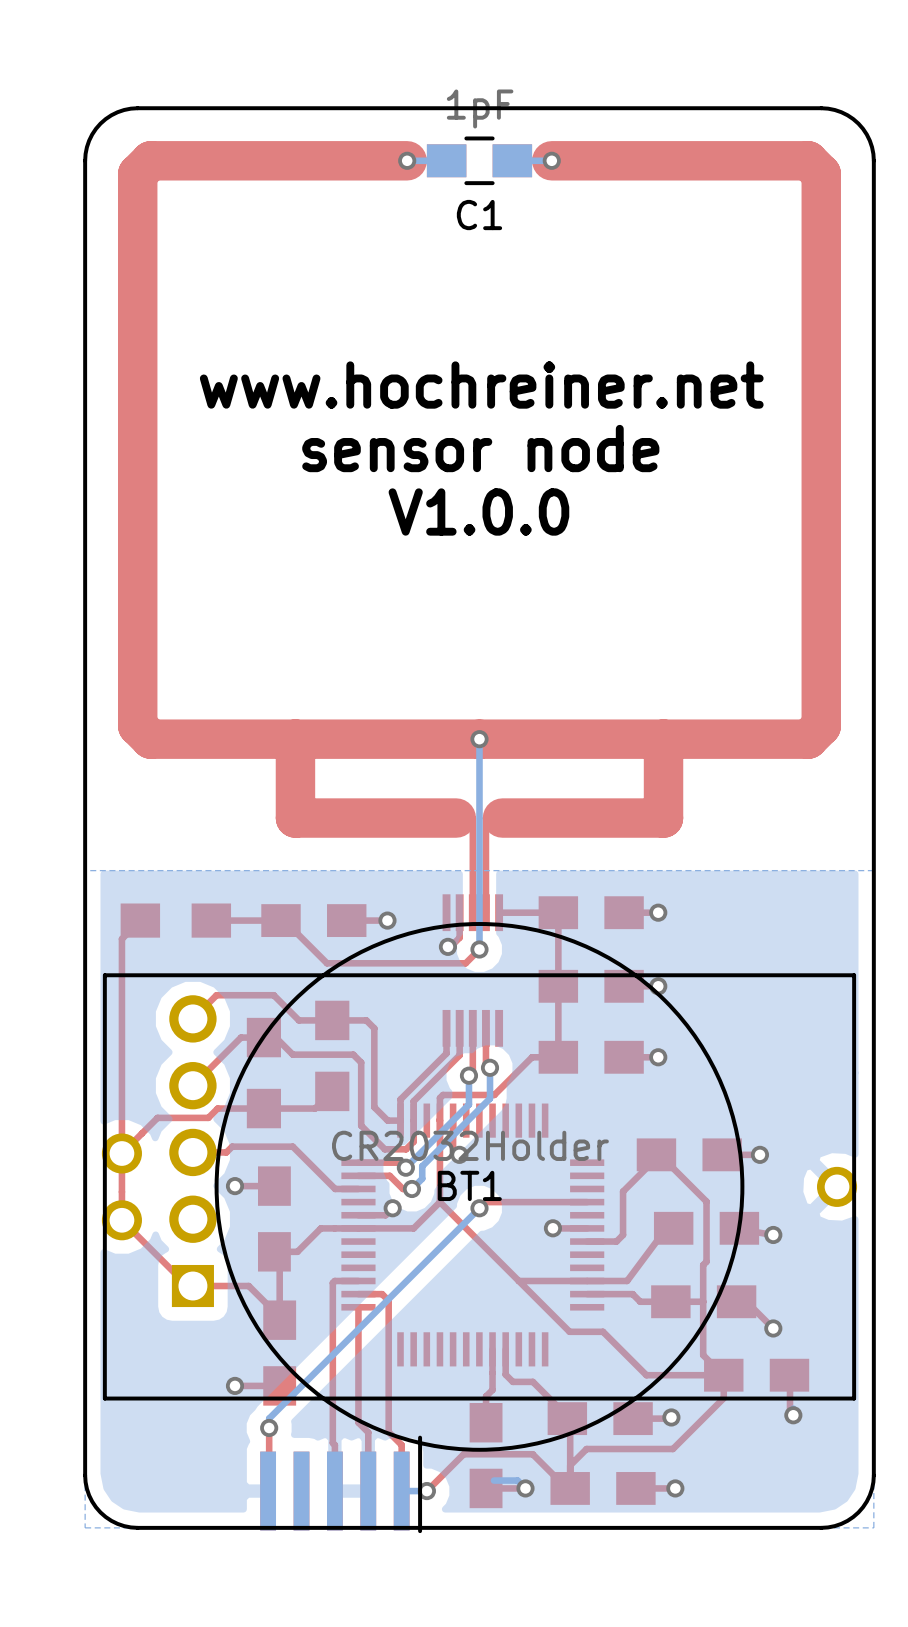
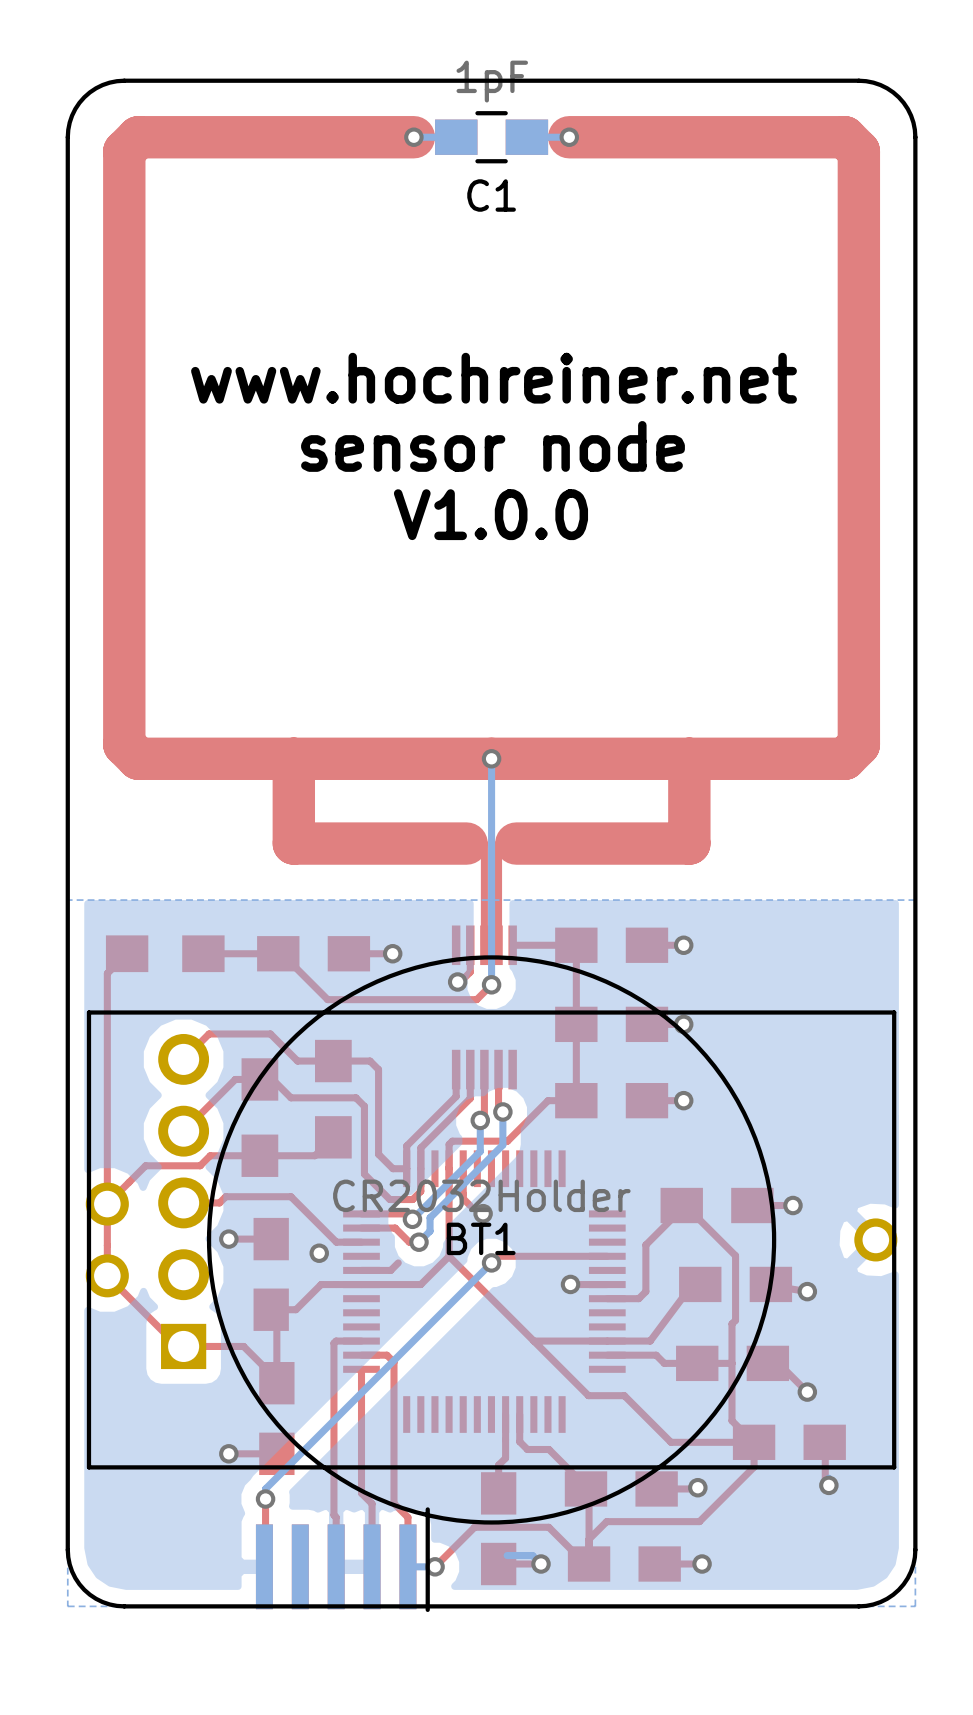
via position: (459, 1154) -> (483, 1213)
via: none -> (319, 1253)
via: (392, 1208) -> none

